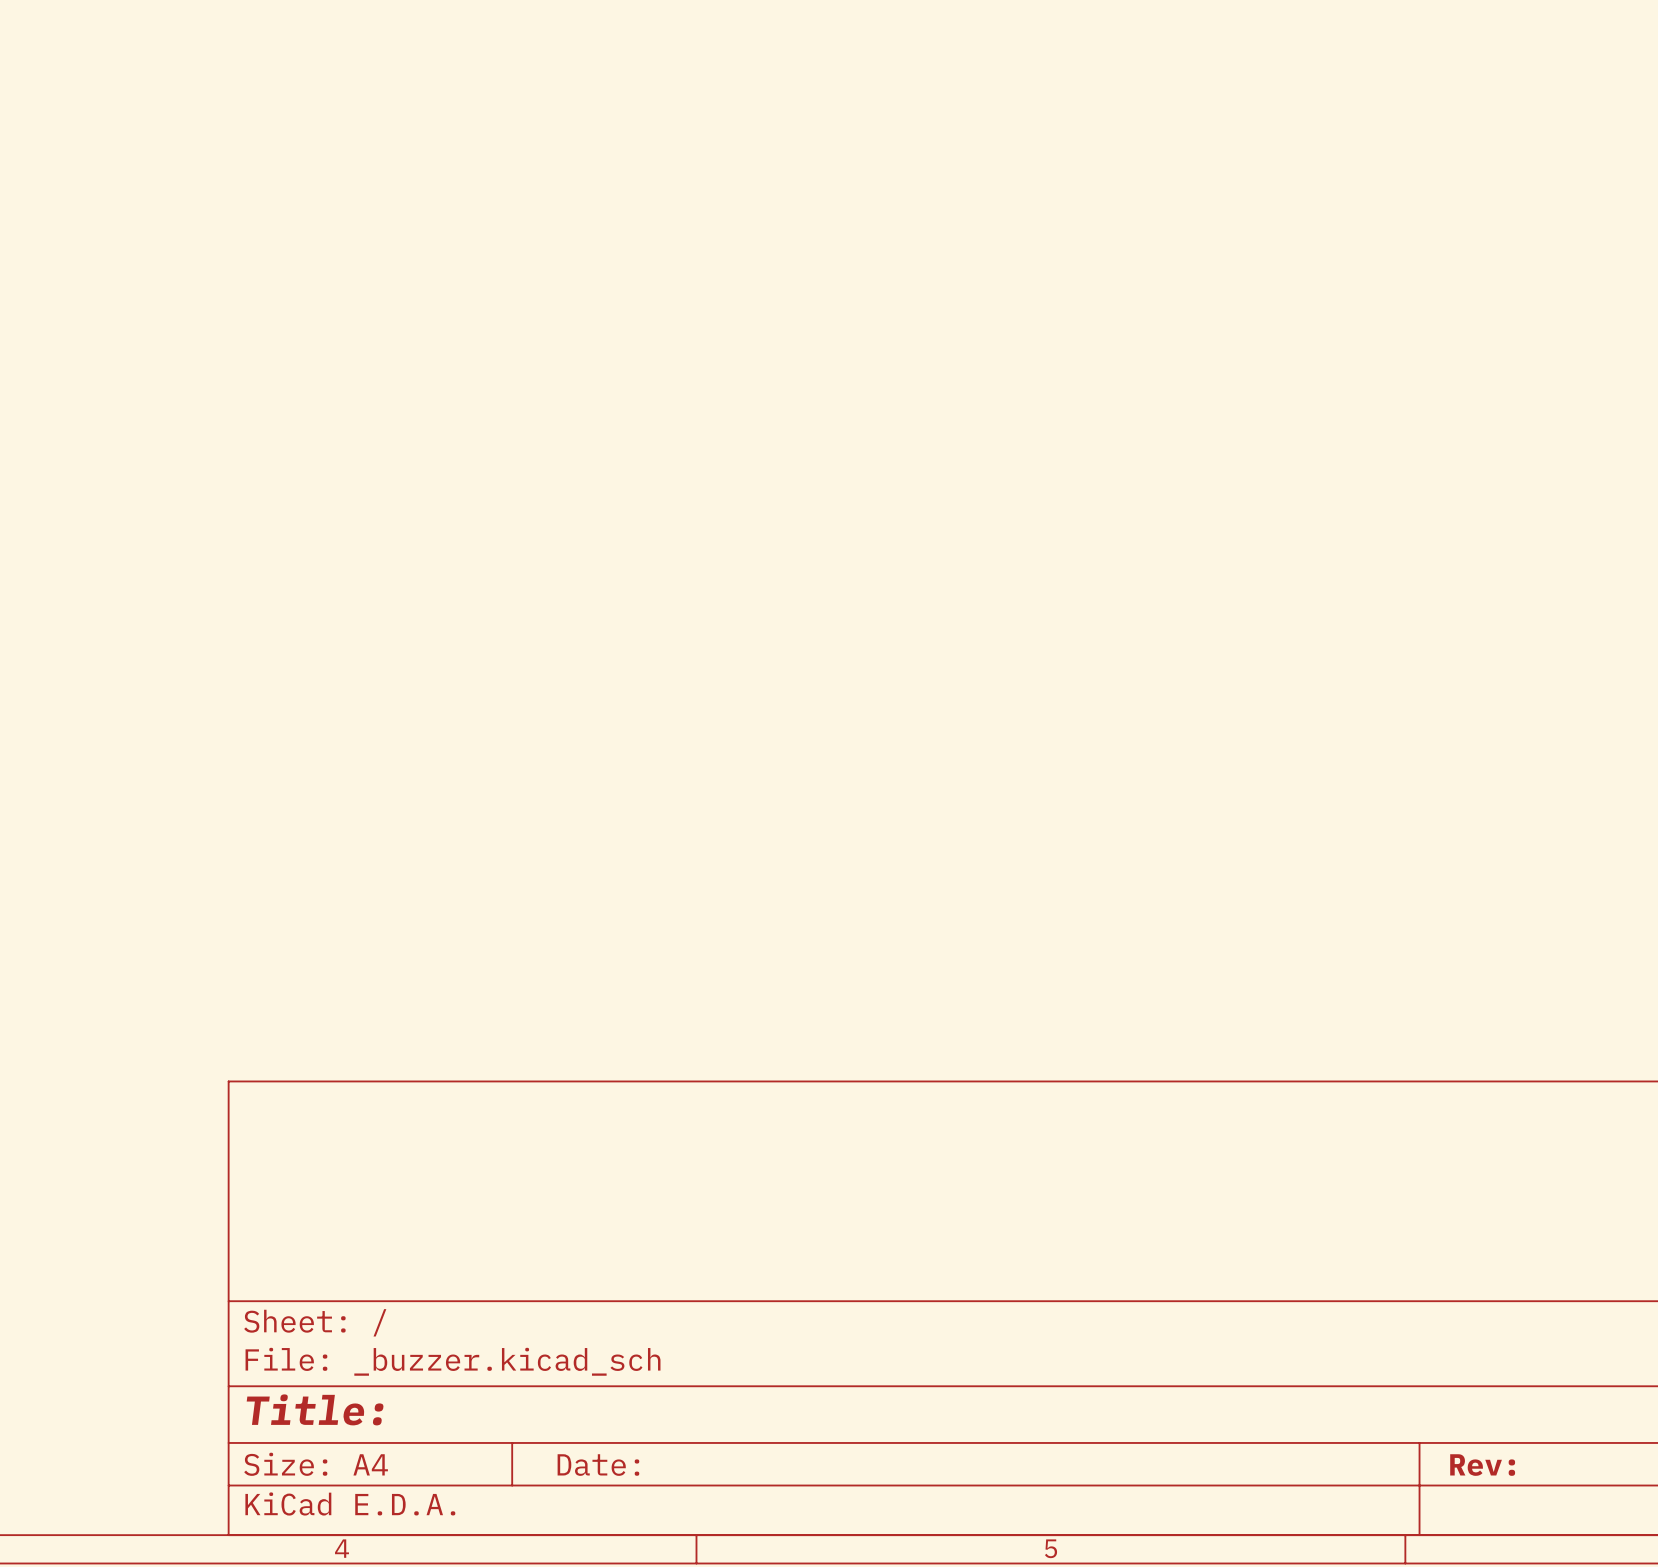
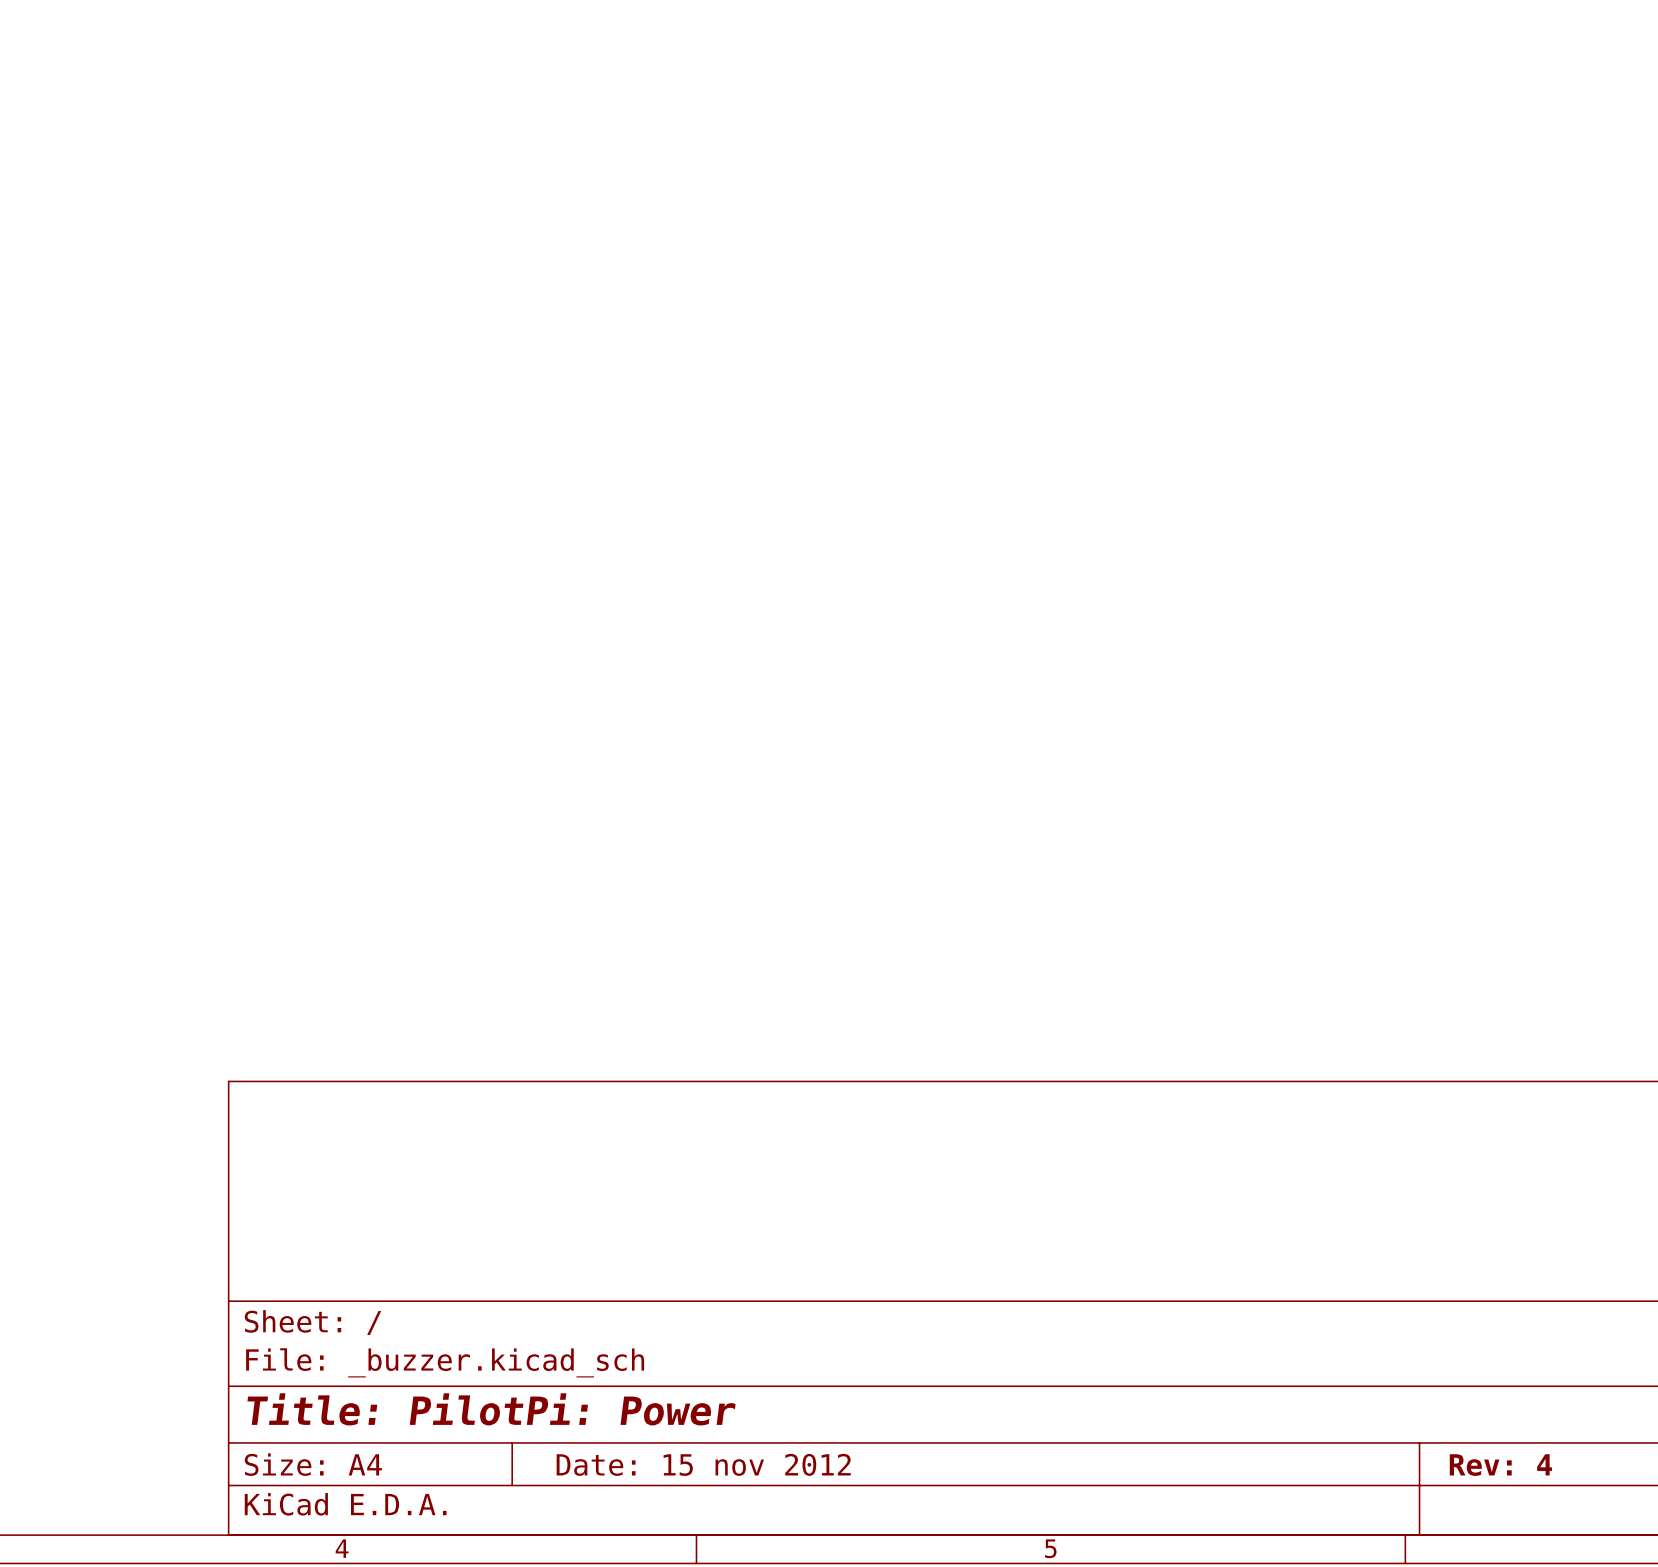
title block: Title: (315, 1409) -> Title: PilotPi: Power (491, 1409)
title block: Date: (598, 1465) -> Date: 15 nov 2012 (703, 1464)
title block: Rev: (1482, 1465) -> Rev: 4 (1500, 1465)

